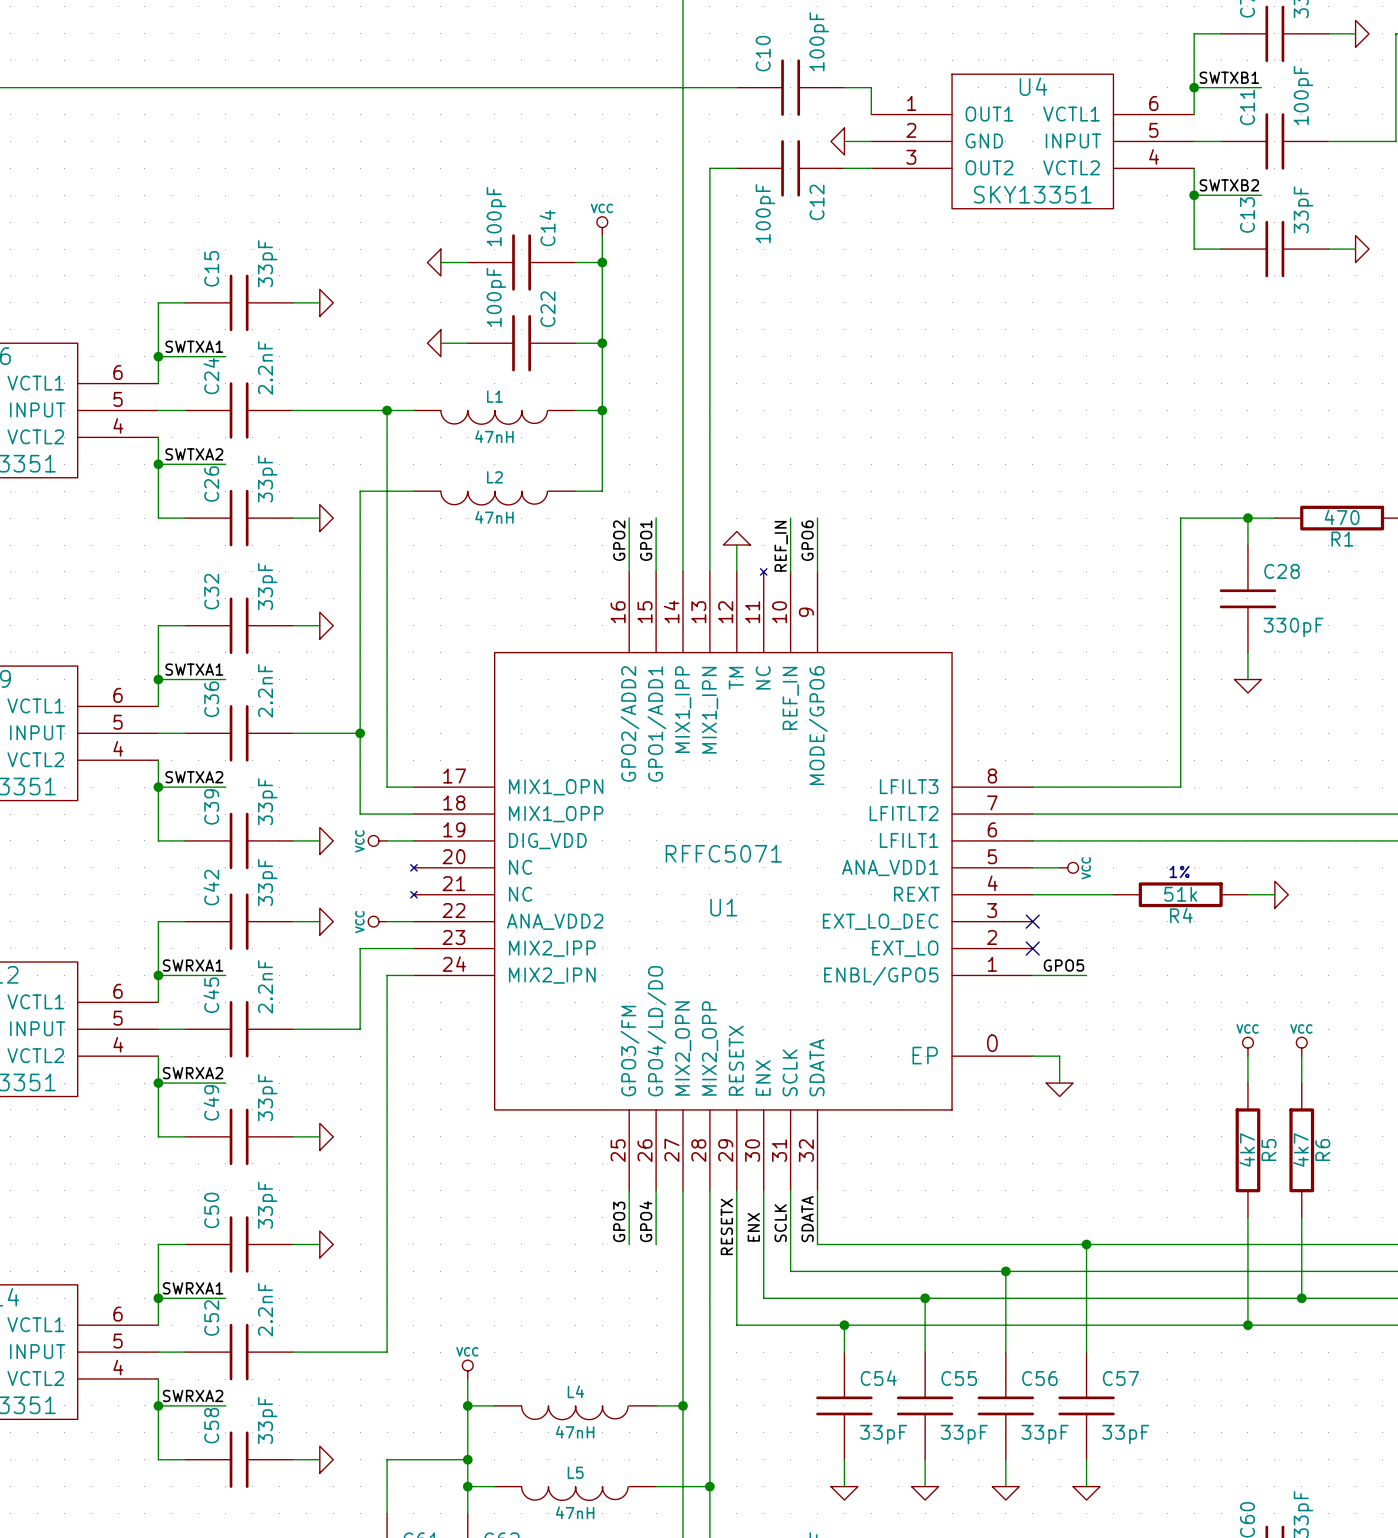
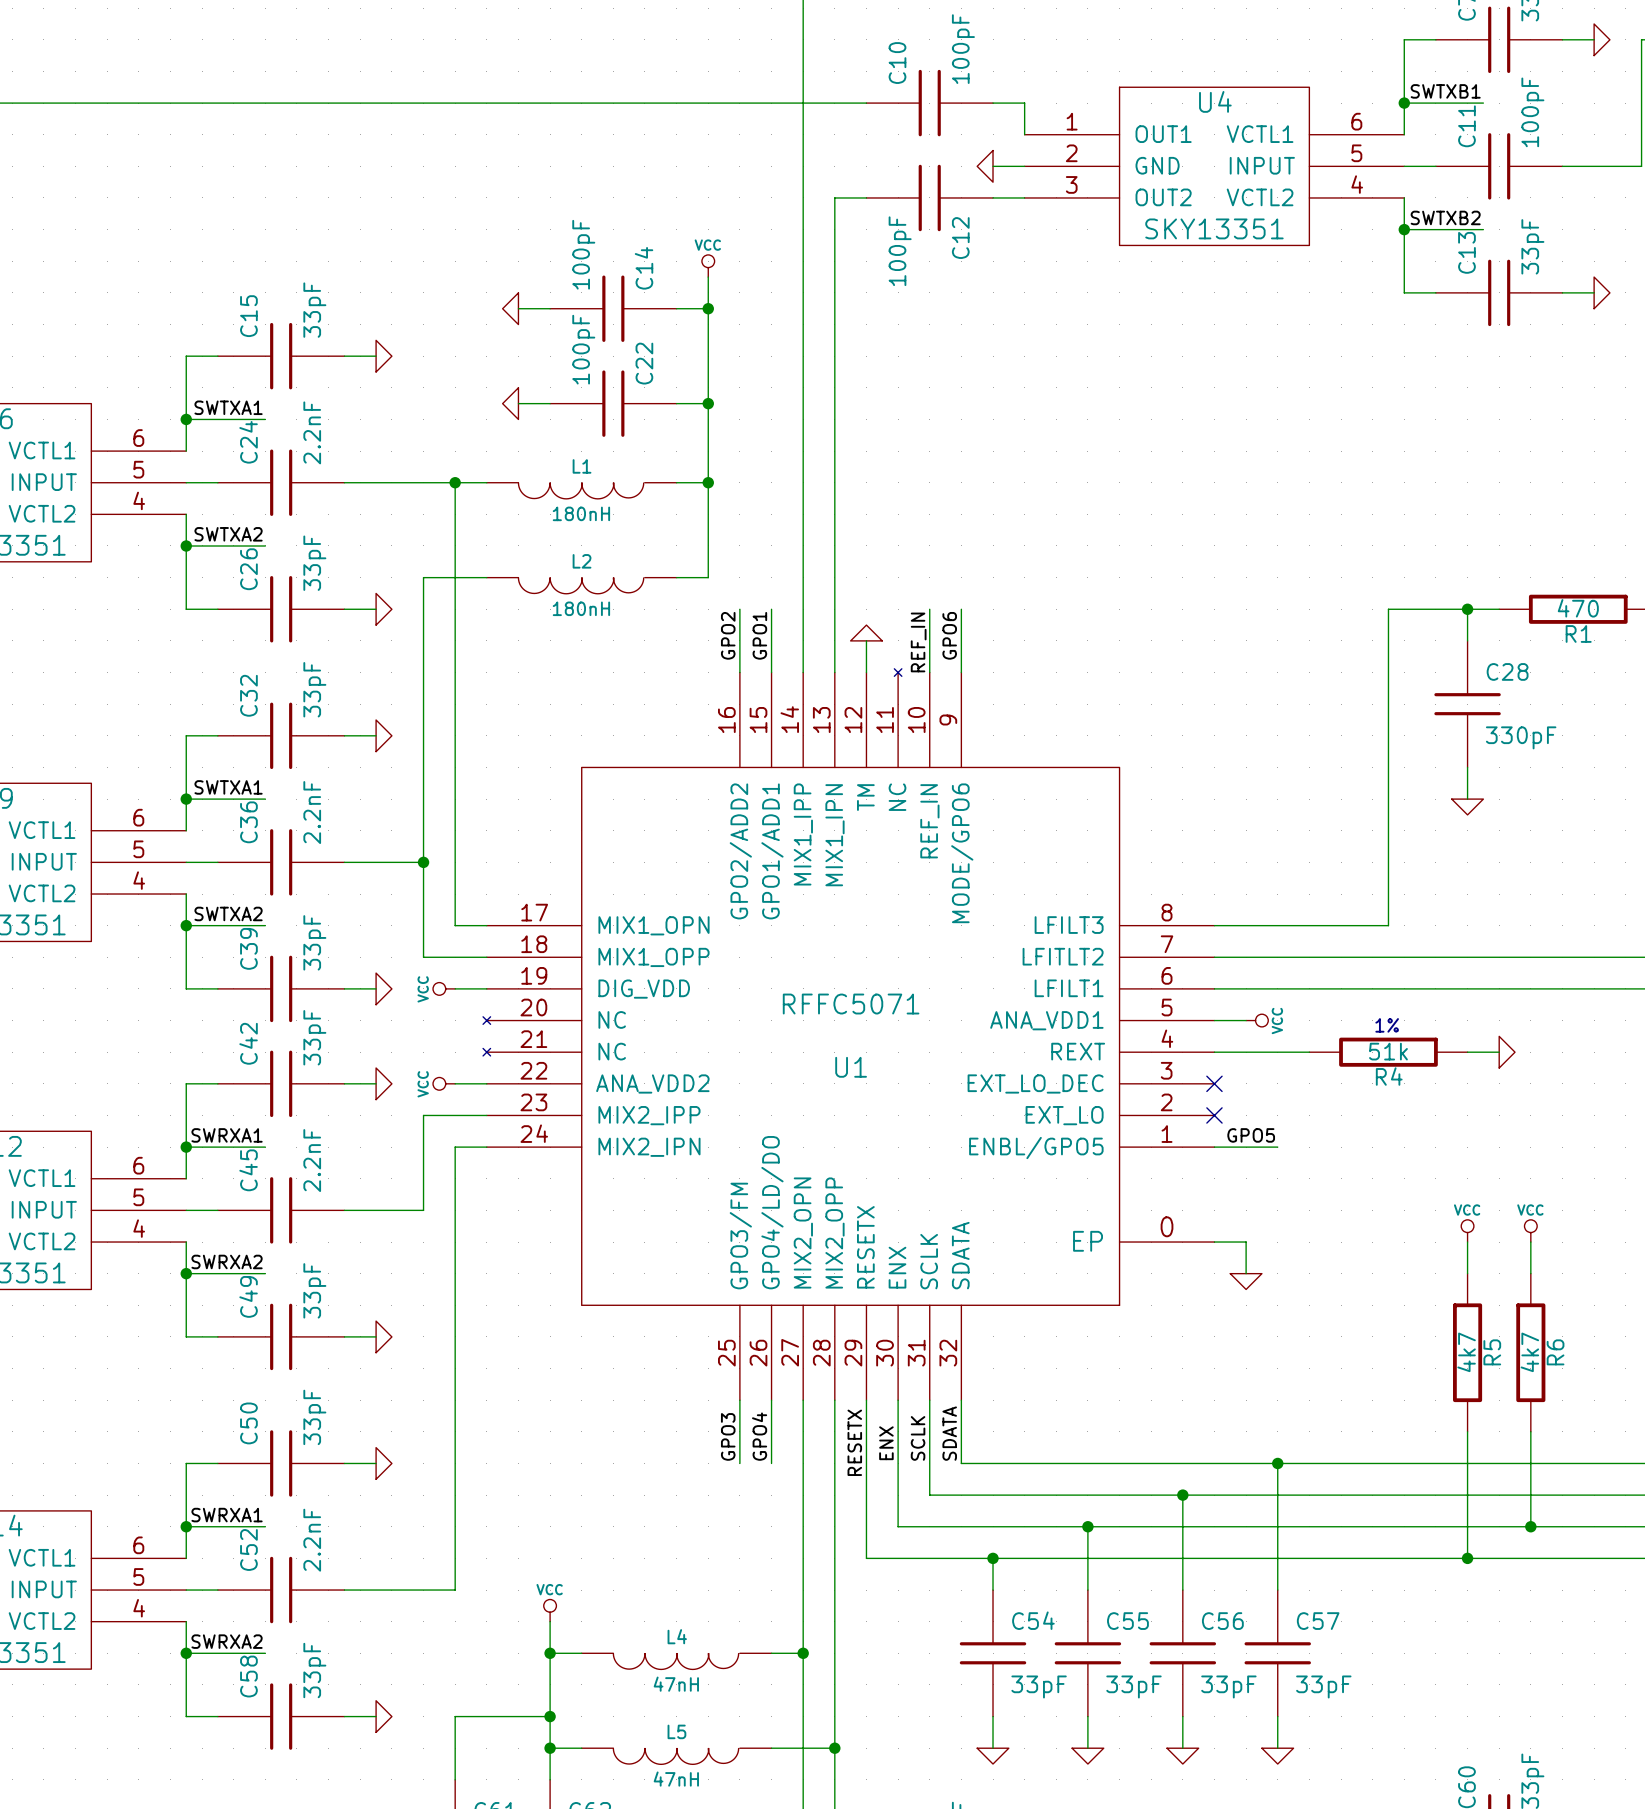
L1 value: 47nH (494, 436) -> 180nH (581, 513)
L2 value: 47nH (494, 517) -> 180nH (581, 608)

